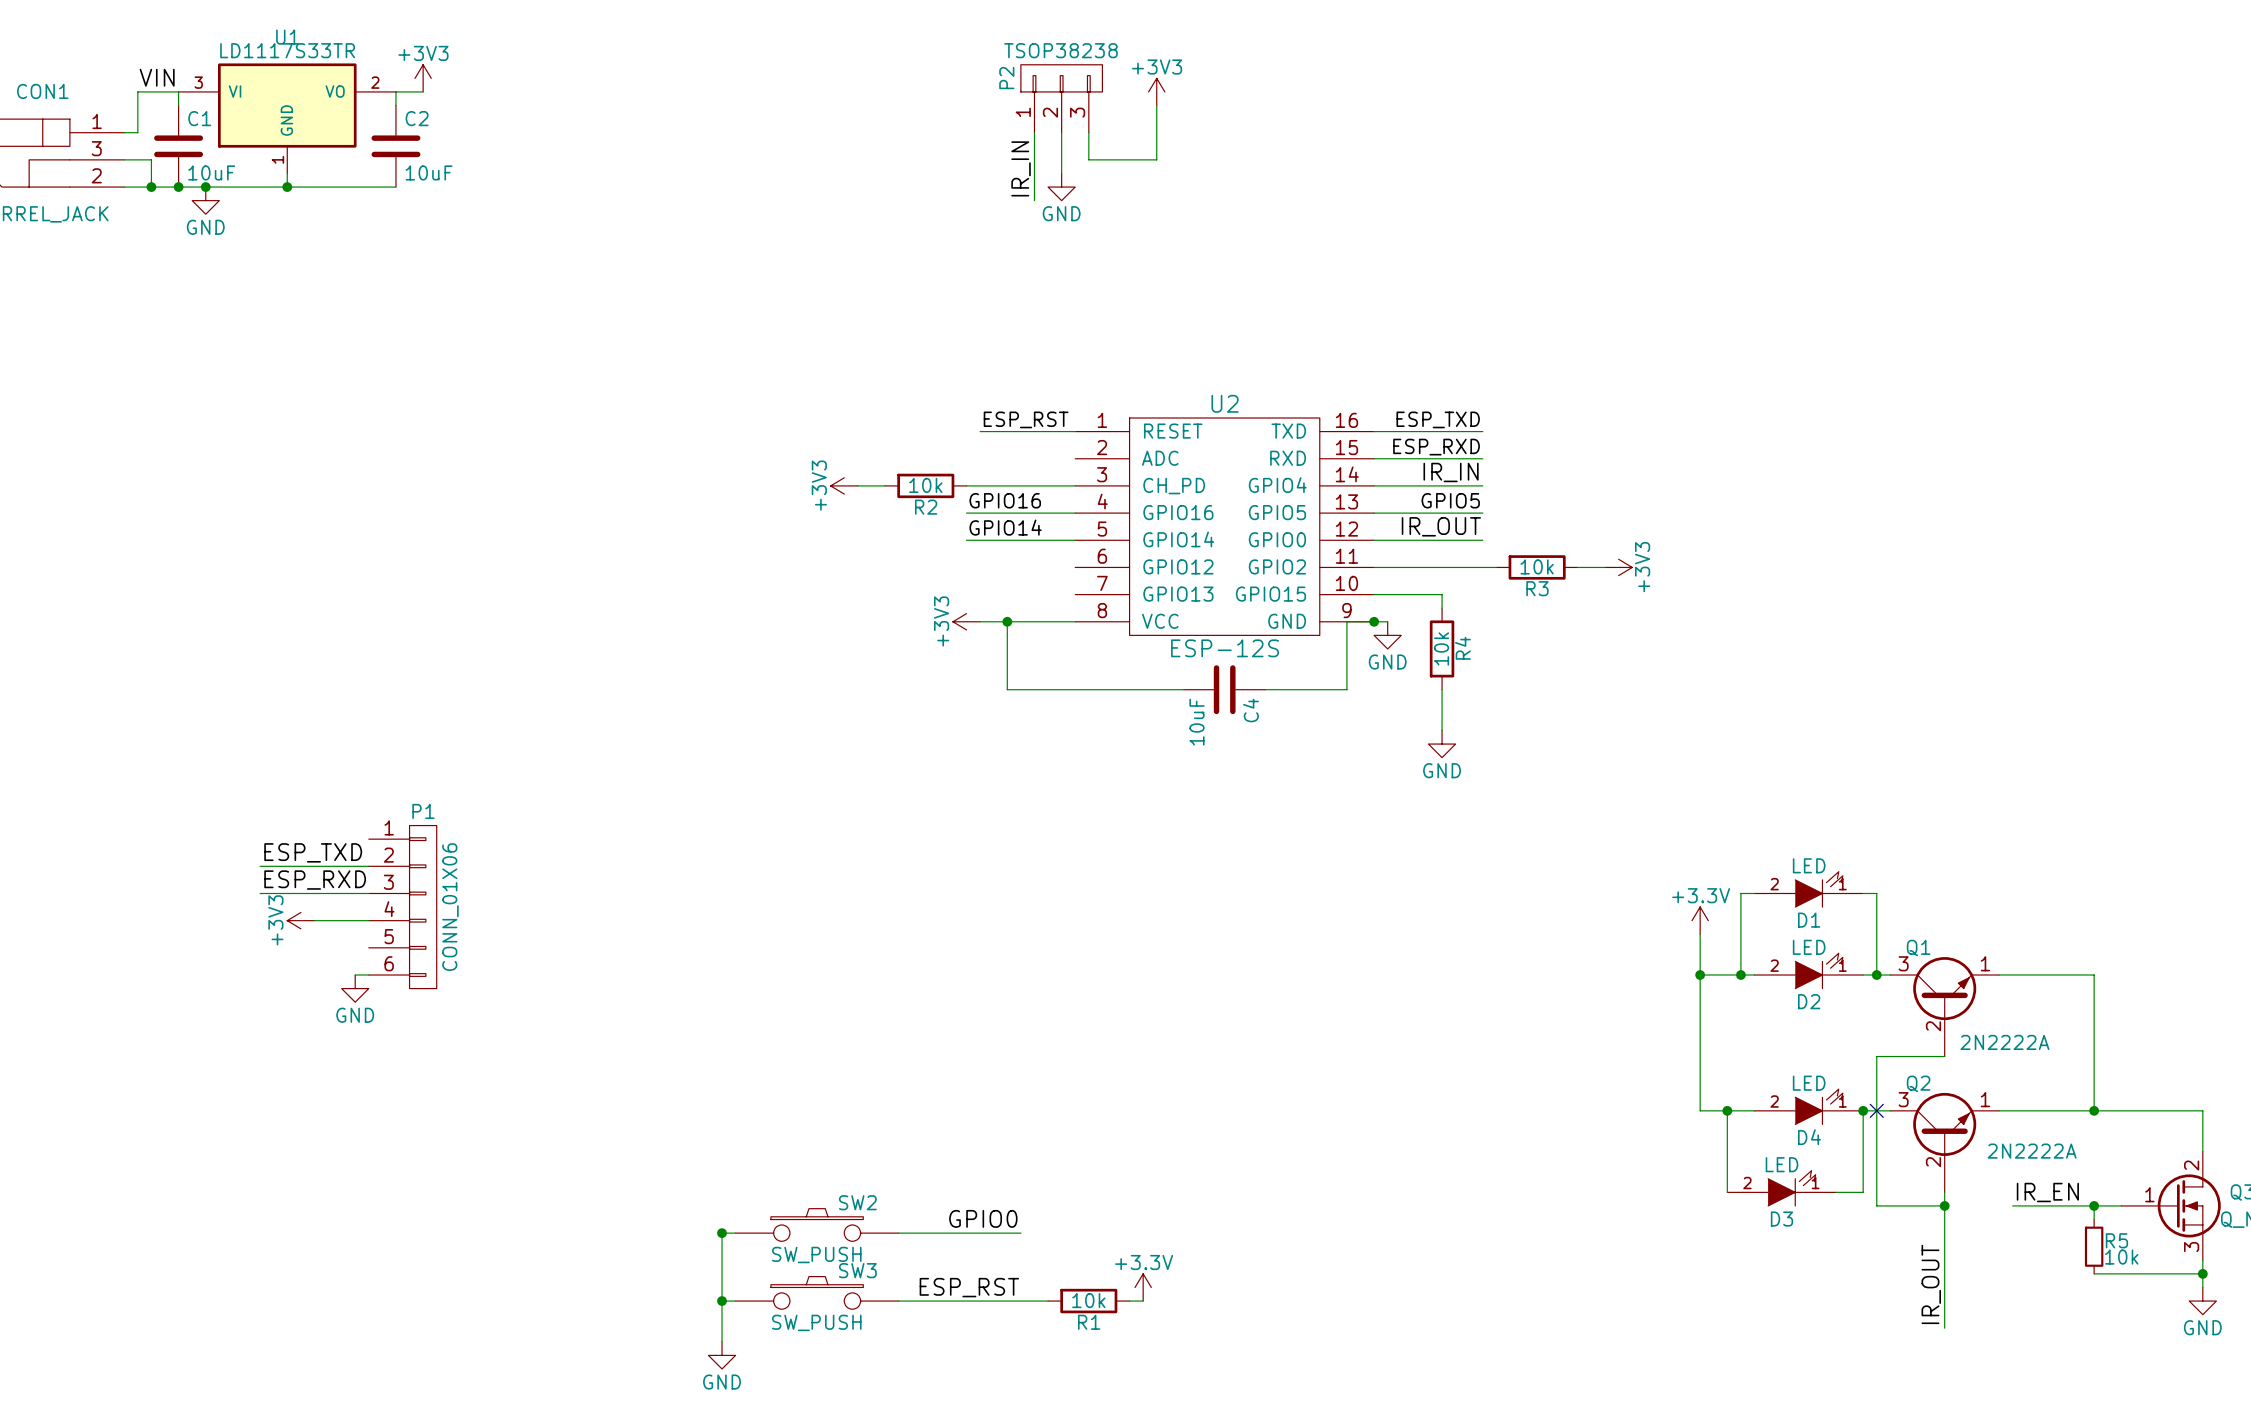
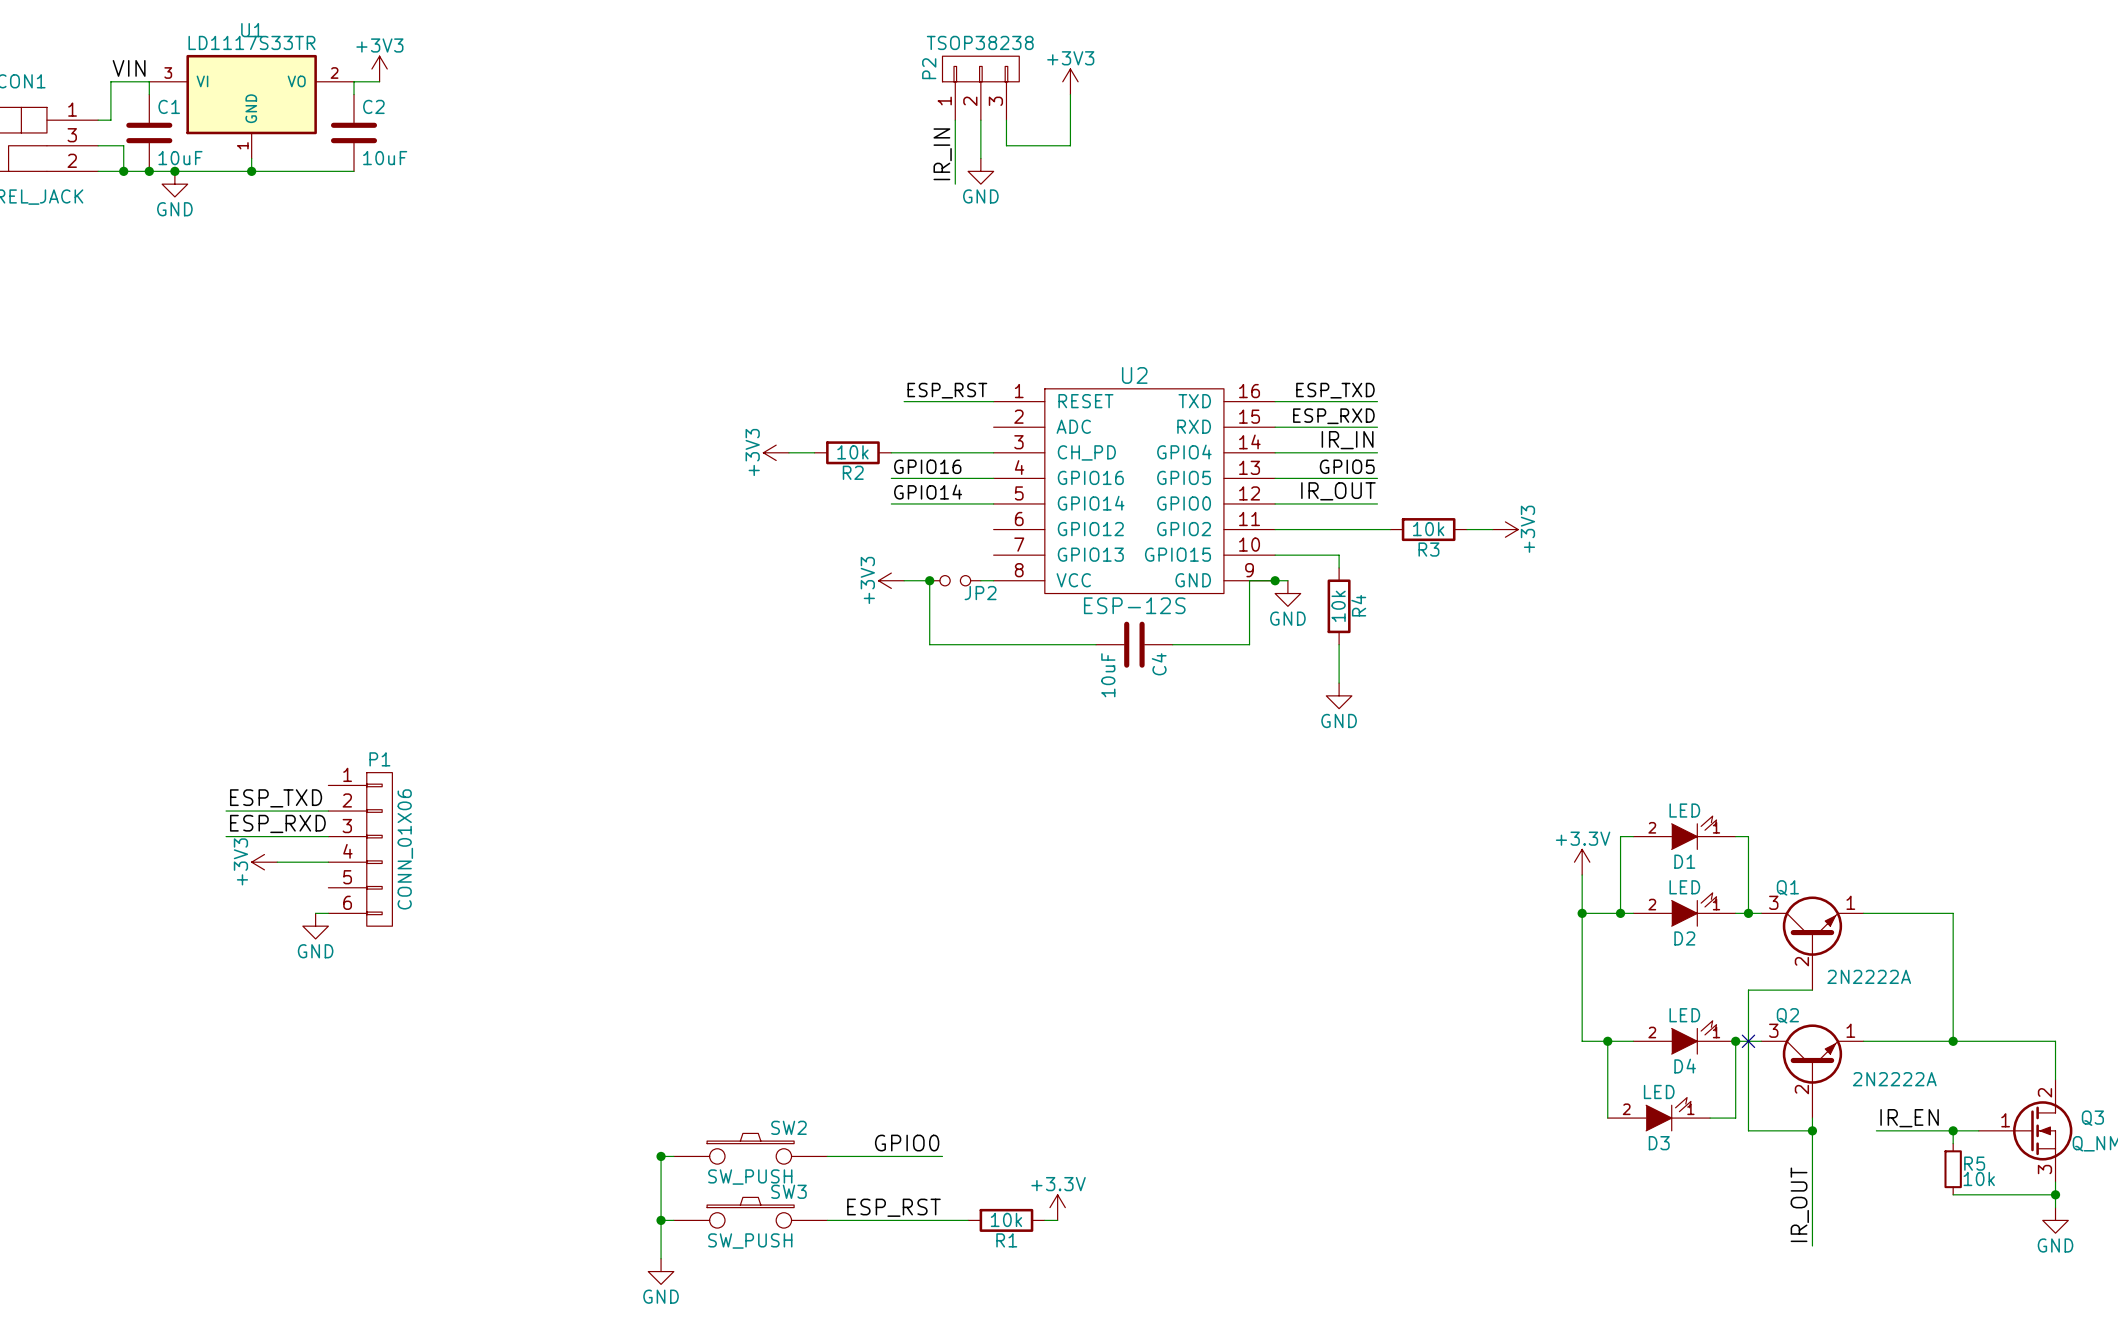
wire: (1007, 621) (1061, 621) -> none
JP2: none -> (955, 580)

